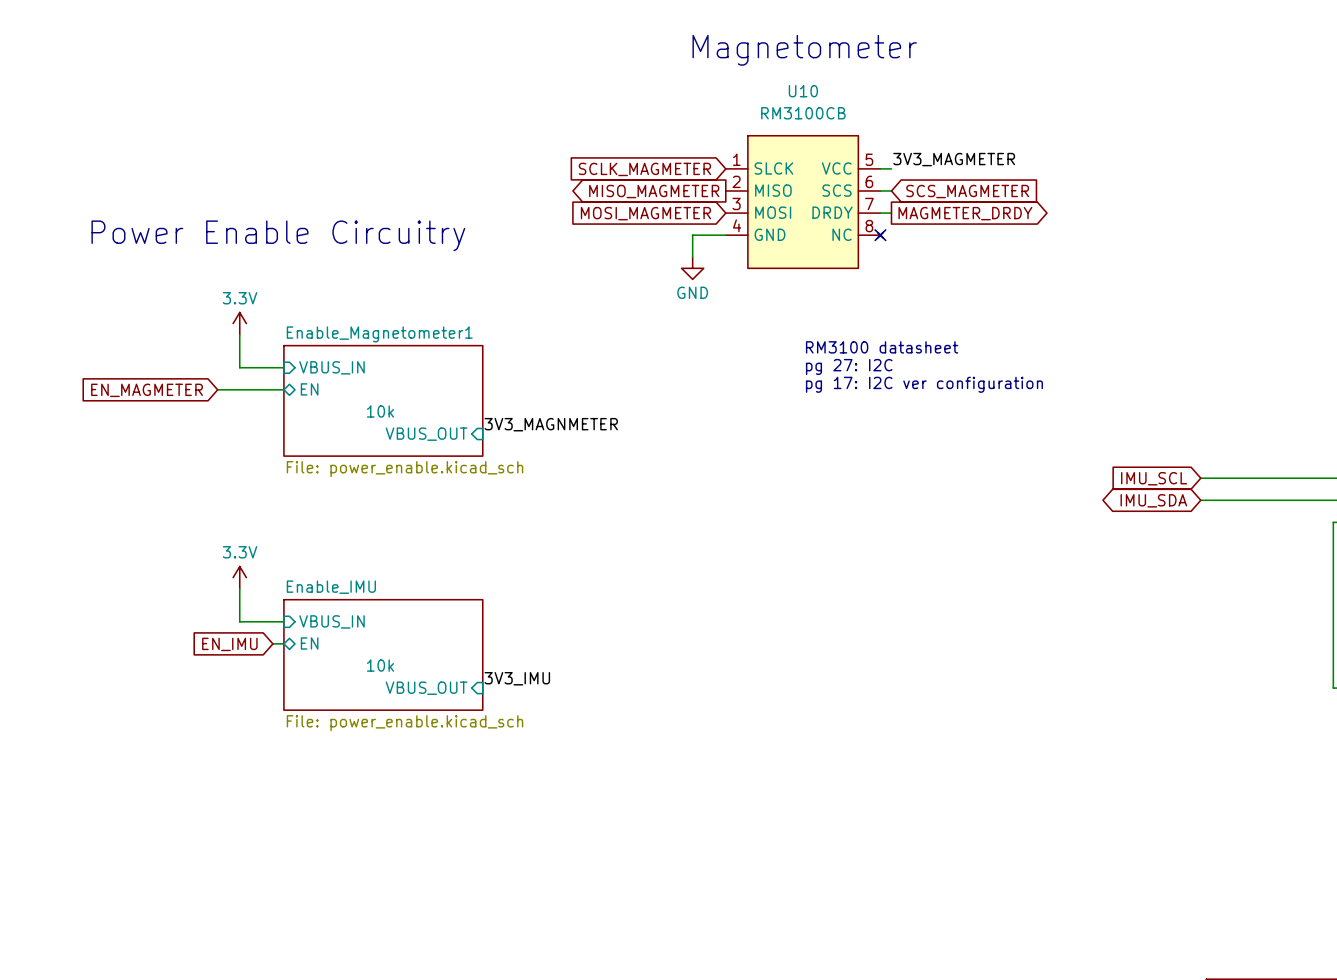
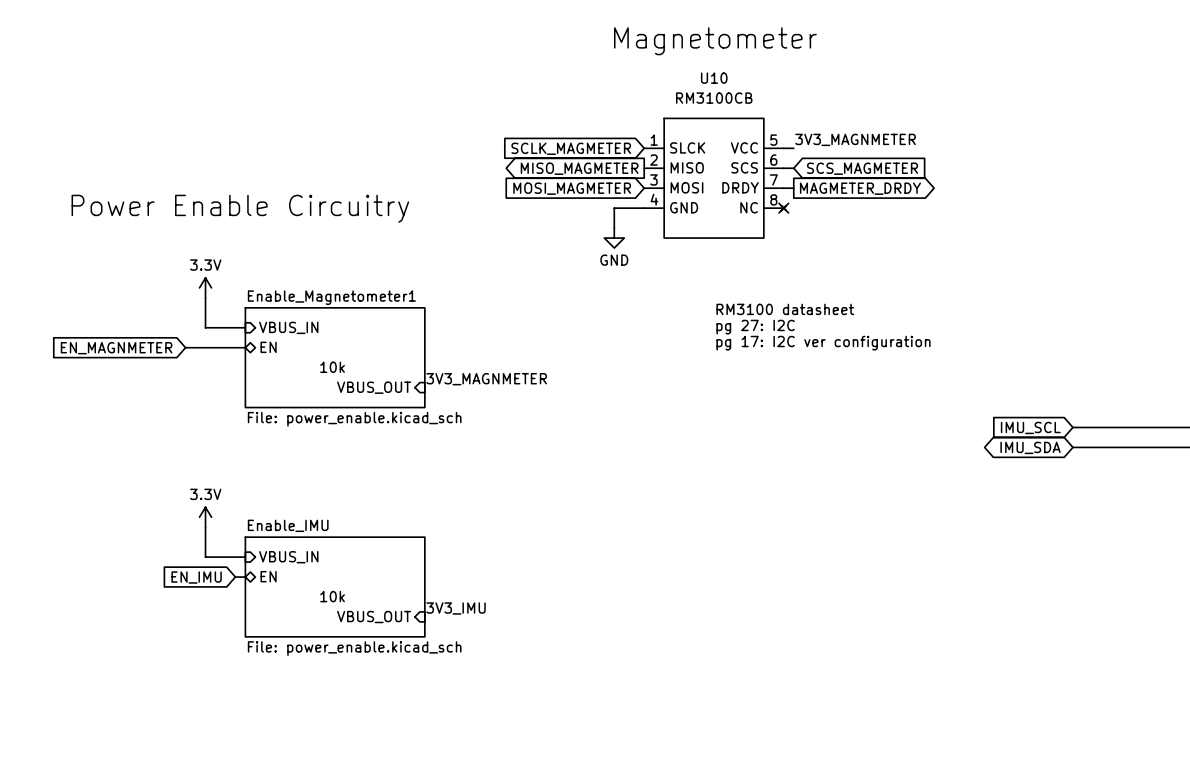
label: 3V3_MAGMETER (954, 159) -> 3V3_MAGNMETER (855, 139)
global label: EN_MAGMETER (147, 390) -> EN_MAGNMETER (116, 348)

